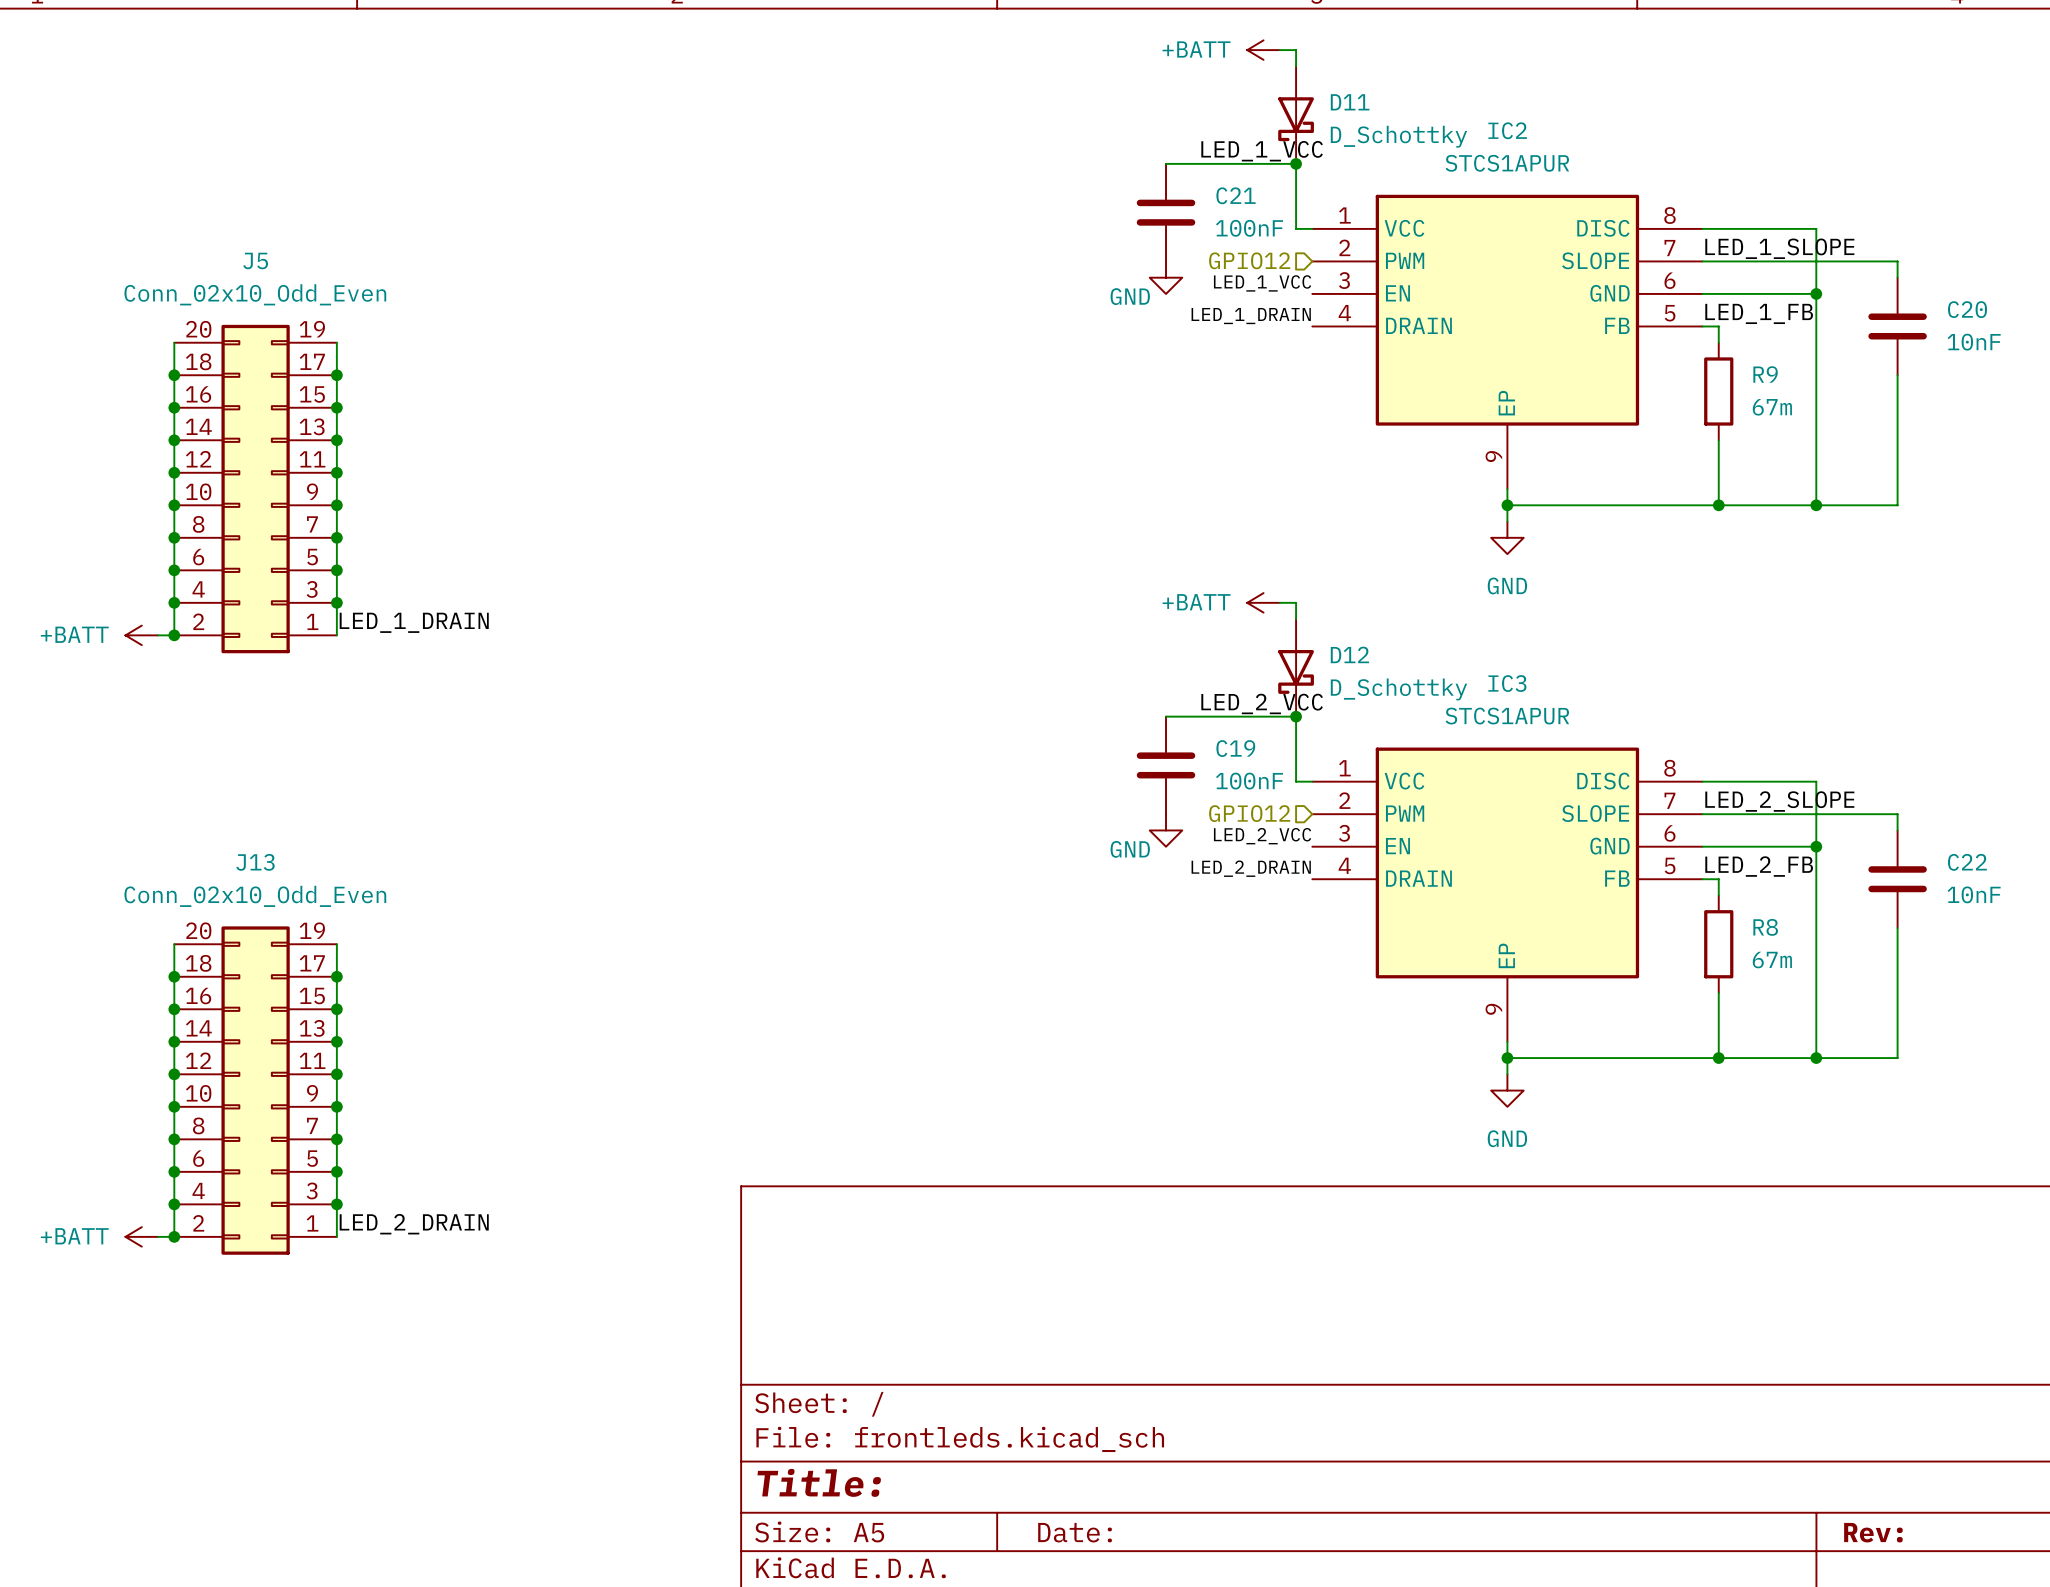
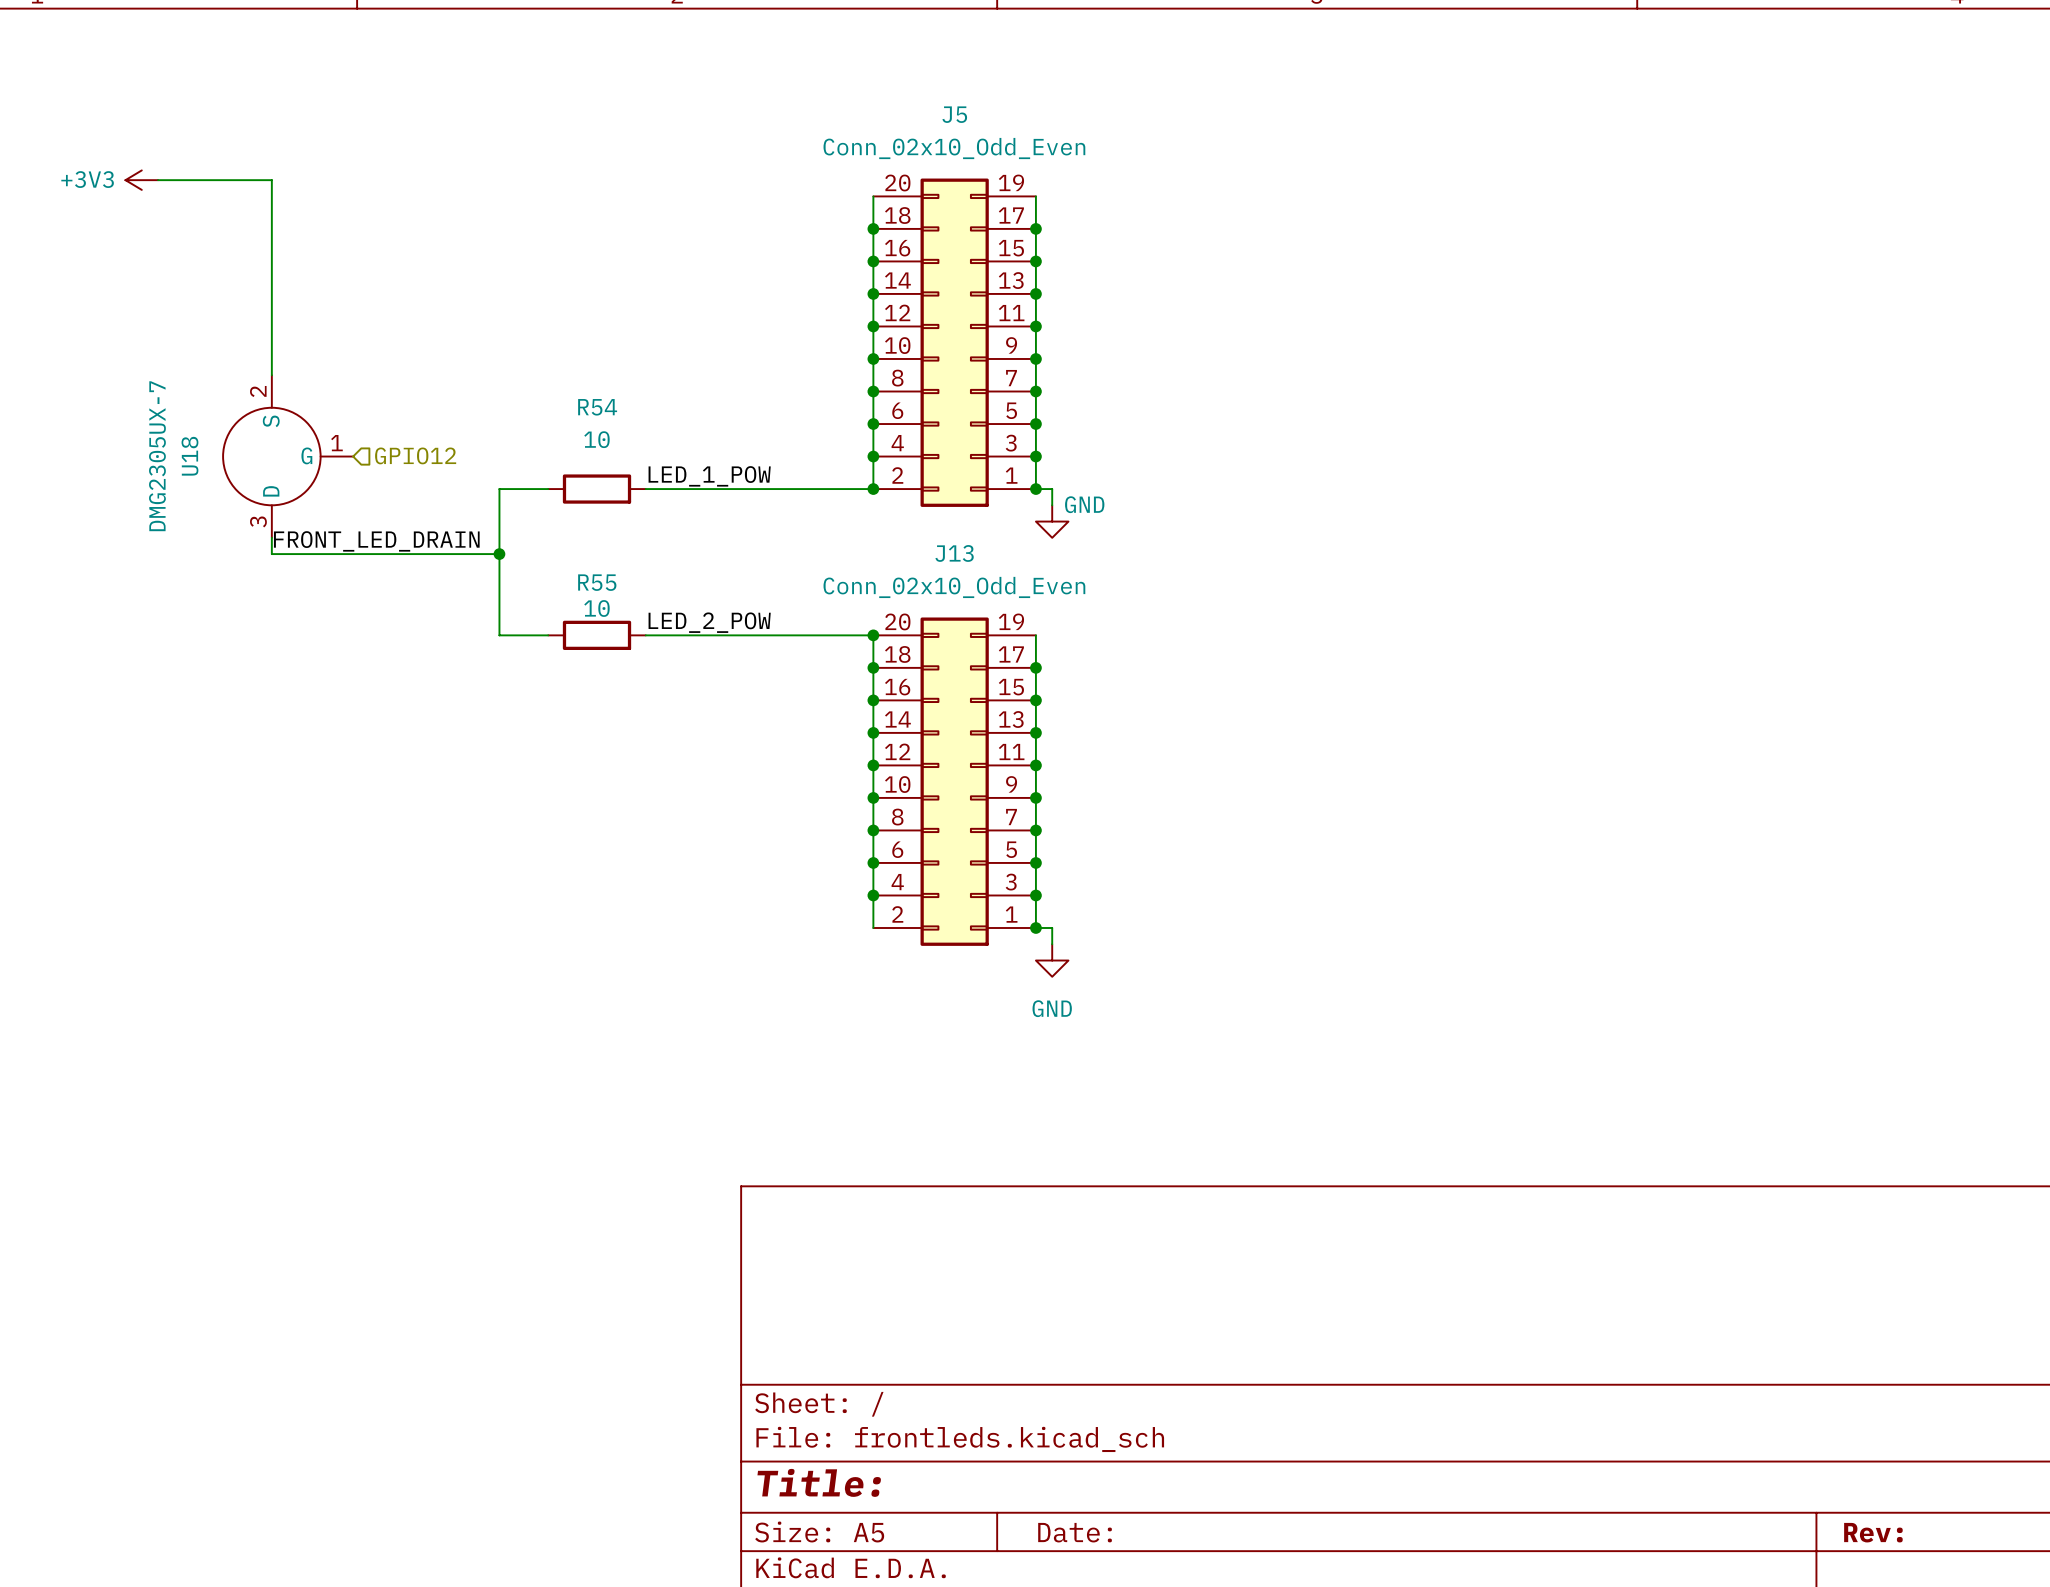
power symbol: +BATT (1263, 50) -> none
wire: (1279, 50) (1296, 50) (1296, 66) -> none
D11: D_Schottky (1296, 115) -> none
label: LED_1_VCC (1262, 151) -> none
wire: (1166, 163) (1296, 163) (1296, 228) (1312, 228) -> none
junction: (1296, 163) -> none
power symbol: none -> +3V3 (141, 180)
wire: none -> (158, 180) (271, 180) (271, 375)
wire: none -> (873, 196) (873, 489) (645, 489)
wire: none -> (1035, 196) (1035, 489) (1052, 489) (1052, 505)
C21: 100nF (1166, 212) -> none
junction: none -> (873, 228)
junction: none -> (1035, 228)
wire: (1702, 228) (1816, 228) (1816, 505) -> none
label: LED_1_SLOPE (1779, 248) -> none
hierarchical label: GPIO12 (1249, 260) -> none
junction: none -> (873, 261)
junction: none -> (1035, 261)
wire: (1702, 261) (1897, 261) (1897, 277) -> none
power symbol: GND (1166, 277) -> none
label: LED_1_VCC (1262, 283) -> none
junction: none -> (873, 293)
junction: none -> (1035, 293)
wire: (1702, 293) (1816, 293) -> none
junction: (1816, 293) -> none
label: LED_1_FB (1759, 313) -> none
label: LED_1_DRAIN (1251, 316) -> none
junction: none -> (873, 326)
junction: none -> (1035, 326)
wire: (1702, 326) (1718, 326) (1718, 342) -> none
C20: 10nF (1897, 326) -> none
IC2: STCS1APUR (1507, 341) -> none
wire: (174, 342) (174, 635) (158, 635) -> none
wire: (336, 342) (336, 635) -> none
junction: none -> (873, 358)
junction: none -> (1035, 358)
junction: (174, 375) -> none
junction: (336, 375) -> none
wire: (1897, 375) (1897, 505) (1507, 505) -> none
junction: none -> (873, 391)
junction: none -> (1035, 391)
R9: 67m (1718, 391) -> none
junction: (174, 407) -> none
junction: (336, 407) -> none
junction: none -> (873, 424)
junction: none -> (1035, 424)
junction: (174, 440) -> none
junction: (336, 440) -> none
wire: (1718, 440) (1718, 505) -> none
hierarchical label: none -> GPIO12 (415, 455)
U18: none -> DMG2305UX-7 (288, 456)
junction: none -> (873, 456)
junction: none -> (1035, 456)
junction: (174, 472) -> none
junction: (336, 472) -> none
label: none -> LED_1_POW (709, 476)
J5 position: (255, 489) -> (954, 342)
wire: none -> (548, 489) (499, 489) (499, 635) (548, 635)
R54: none -> 10 (597, 489)
junction: none -> (873, 489)
junction: none -> (1035, 489)
wire: (1507, 489) (1507, 521) -> none
junction: (174, 505) -> none
junction: (336, 505) -> none
junction: (1507, 505) -> none
junction: (1718, 505) -> none
junction: (1816, 505) -> none
power symbol: none -> GND (1052, 521)
junction: (174, 537) -> none
wire: none -> (271, 537) (271, 554) (499, 554)
junction: (336, 537) -> none
power symbol: GND (1507, 537) -> none
label: none -> FRONT_LED_DRAIN (376, 541)
junction: none -> (499, 554)
junction: (174, 570) -> none
junction: (336, 570) -> none
junction: (174, 602) -> none
junction: (336, 602) -> none
power symbol: +BATT (1263, 602) -> none
wire: (1279, 602) (1296, 602) (1296, 619) -> none
label: LED_1_DRAIN (414, 622) -> none
label: none -> LED_2_POW (709, 622)
power symbol: +BATT (141, 635) -> none
junction: (174, 635) -> none
R55: none -> 10 (597, 635)
wire: none -> (645, 635) (873, 635) (873, 927)
junction: none -> (873, 635)
wire: none -> (1035, 635) (1035, 927) (1052, 927) (1052, 944)
junction: none -> (873, 667)
junction: none -> (1035, 667)
D12: D_Schottky (1296, 667) -> none
junction: none -> (873, 700)
junction: none -> (1035, 700)
label: LED_2_VCC (1262, 703) -> none
wire: (1166, 716) (1296, 716) (1296, 781) (1312, 781) -> none
junction: (1296, 716) -> none
junction: none -> (873, 732)
junction: none -> (1035, 732)
junction: none -> (873, 765)
junction: none -> (1035, 765)
C19: 100nF (1166, 765) -> none
wire: (1702, 781) (1816, 781) (1816, 1058) -> none
junction: none -> (873, 797)
junction: none -> (1035, 797)
label: LED_2_SLOPE (1779, 801) -> none
hierarchical label: GPIO12 (1249, 813) -> none
wire: (1702, 814) (1897, 814) (1897, 830) -> none
junction: none -> (873, 830)
junction: none -> (1035, 830)
power symbol: GND (1166, 830) -> none
label: LED_2_VCC (1262, 836) -> none
wire: (1702, 846) (1816, 846) -> none
junction: (1816, 846) -> none
junction: none -> (873, 862)
junction: none -> (1035, 862)
label: LED_2_FB (1759, 866) -> none
label: LED_2_DRAIN (1251, 868) -> none
wire: (1702, 879) (1718, 879) (1718, 895) -> none
C22: 10nF (1897, 879) -> none
IC3: STCS1APUR (1507, 894) -> none
junction: none -> (873, 895)
junction: none -> (1035, 895)
junction: none -> (1035, 927)
wire: (1897, 927) (1897, 1058) (1507, 1058) -> none
wire: (174, 944) (174, 1236) (158, 1236) -> none
wire: (336, 944) (336, 1236) -> none
R8: 67m (1718, 944) -> none
power symbol: none -> GND (1052, 960)
junction: (174, 976) -> none
junction: (336, 976) -> none
wire: (1718, 993) (1718, 1058) -> none
junction: (174, 1009) -> none
junction: (336, 1009) -> none
junction: (174, 1041) -> none
junction: (336, 1041) -> none
wire: (1507, 1041) (1507, 1074) -> none
junction: (1507, 1058) -> none
junction: (1718, 1058) -> none
junction: (1816, 1058) -> none
junction: (174, 1074) -> none
junction: (336, 1074) -> none
J13 position: (255, 1090) -> (954, 781)
power symbol: GND (1507, 1090) -> none
junction: (174, 1106) -> none
junction: (336, 1106) -> none
junction: (174, 1139) -> none
junction: (336, 1139) -> none
junction: (174, 1171) -> none
junction: (336, 1171) -> none
junction: (174, 1204) -> none
junction: (336, 1204) -> none
label: LED_2_DRAIN (414, 1224) -> none
power symbol: +BATT (141, 1236) -> none
junction: (174, 1236) -> none

